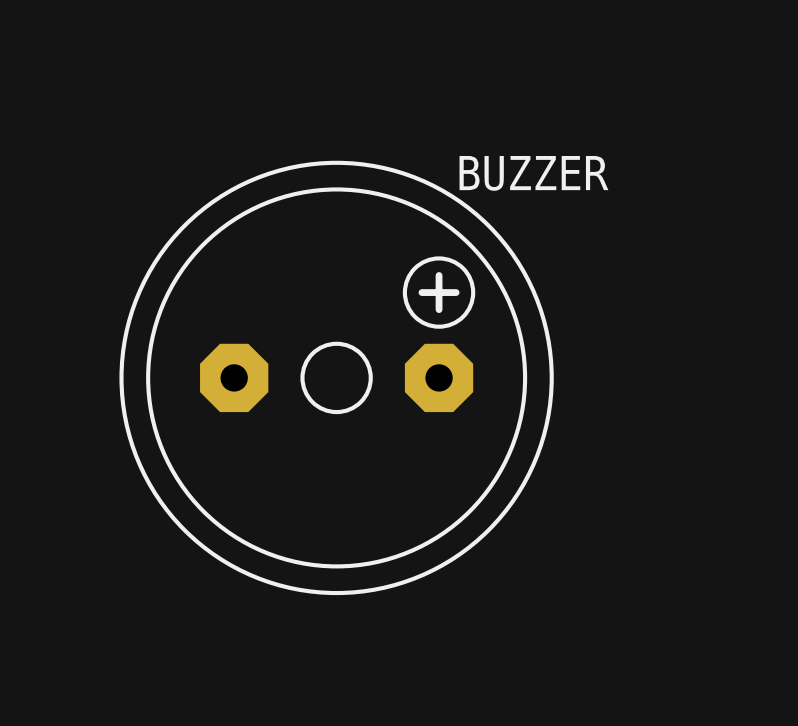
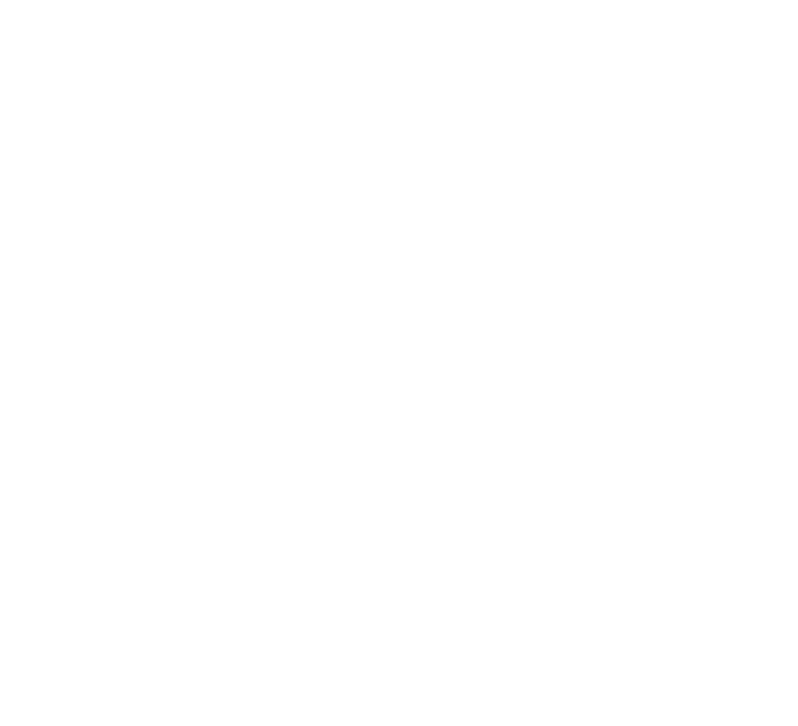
BUZZER: (336, 377) -> none

